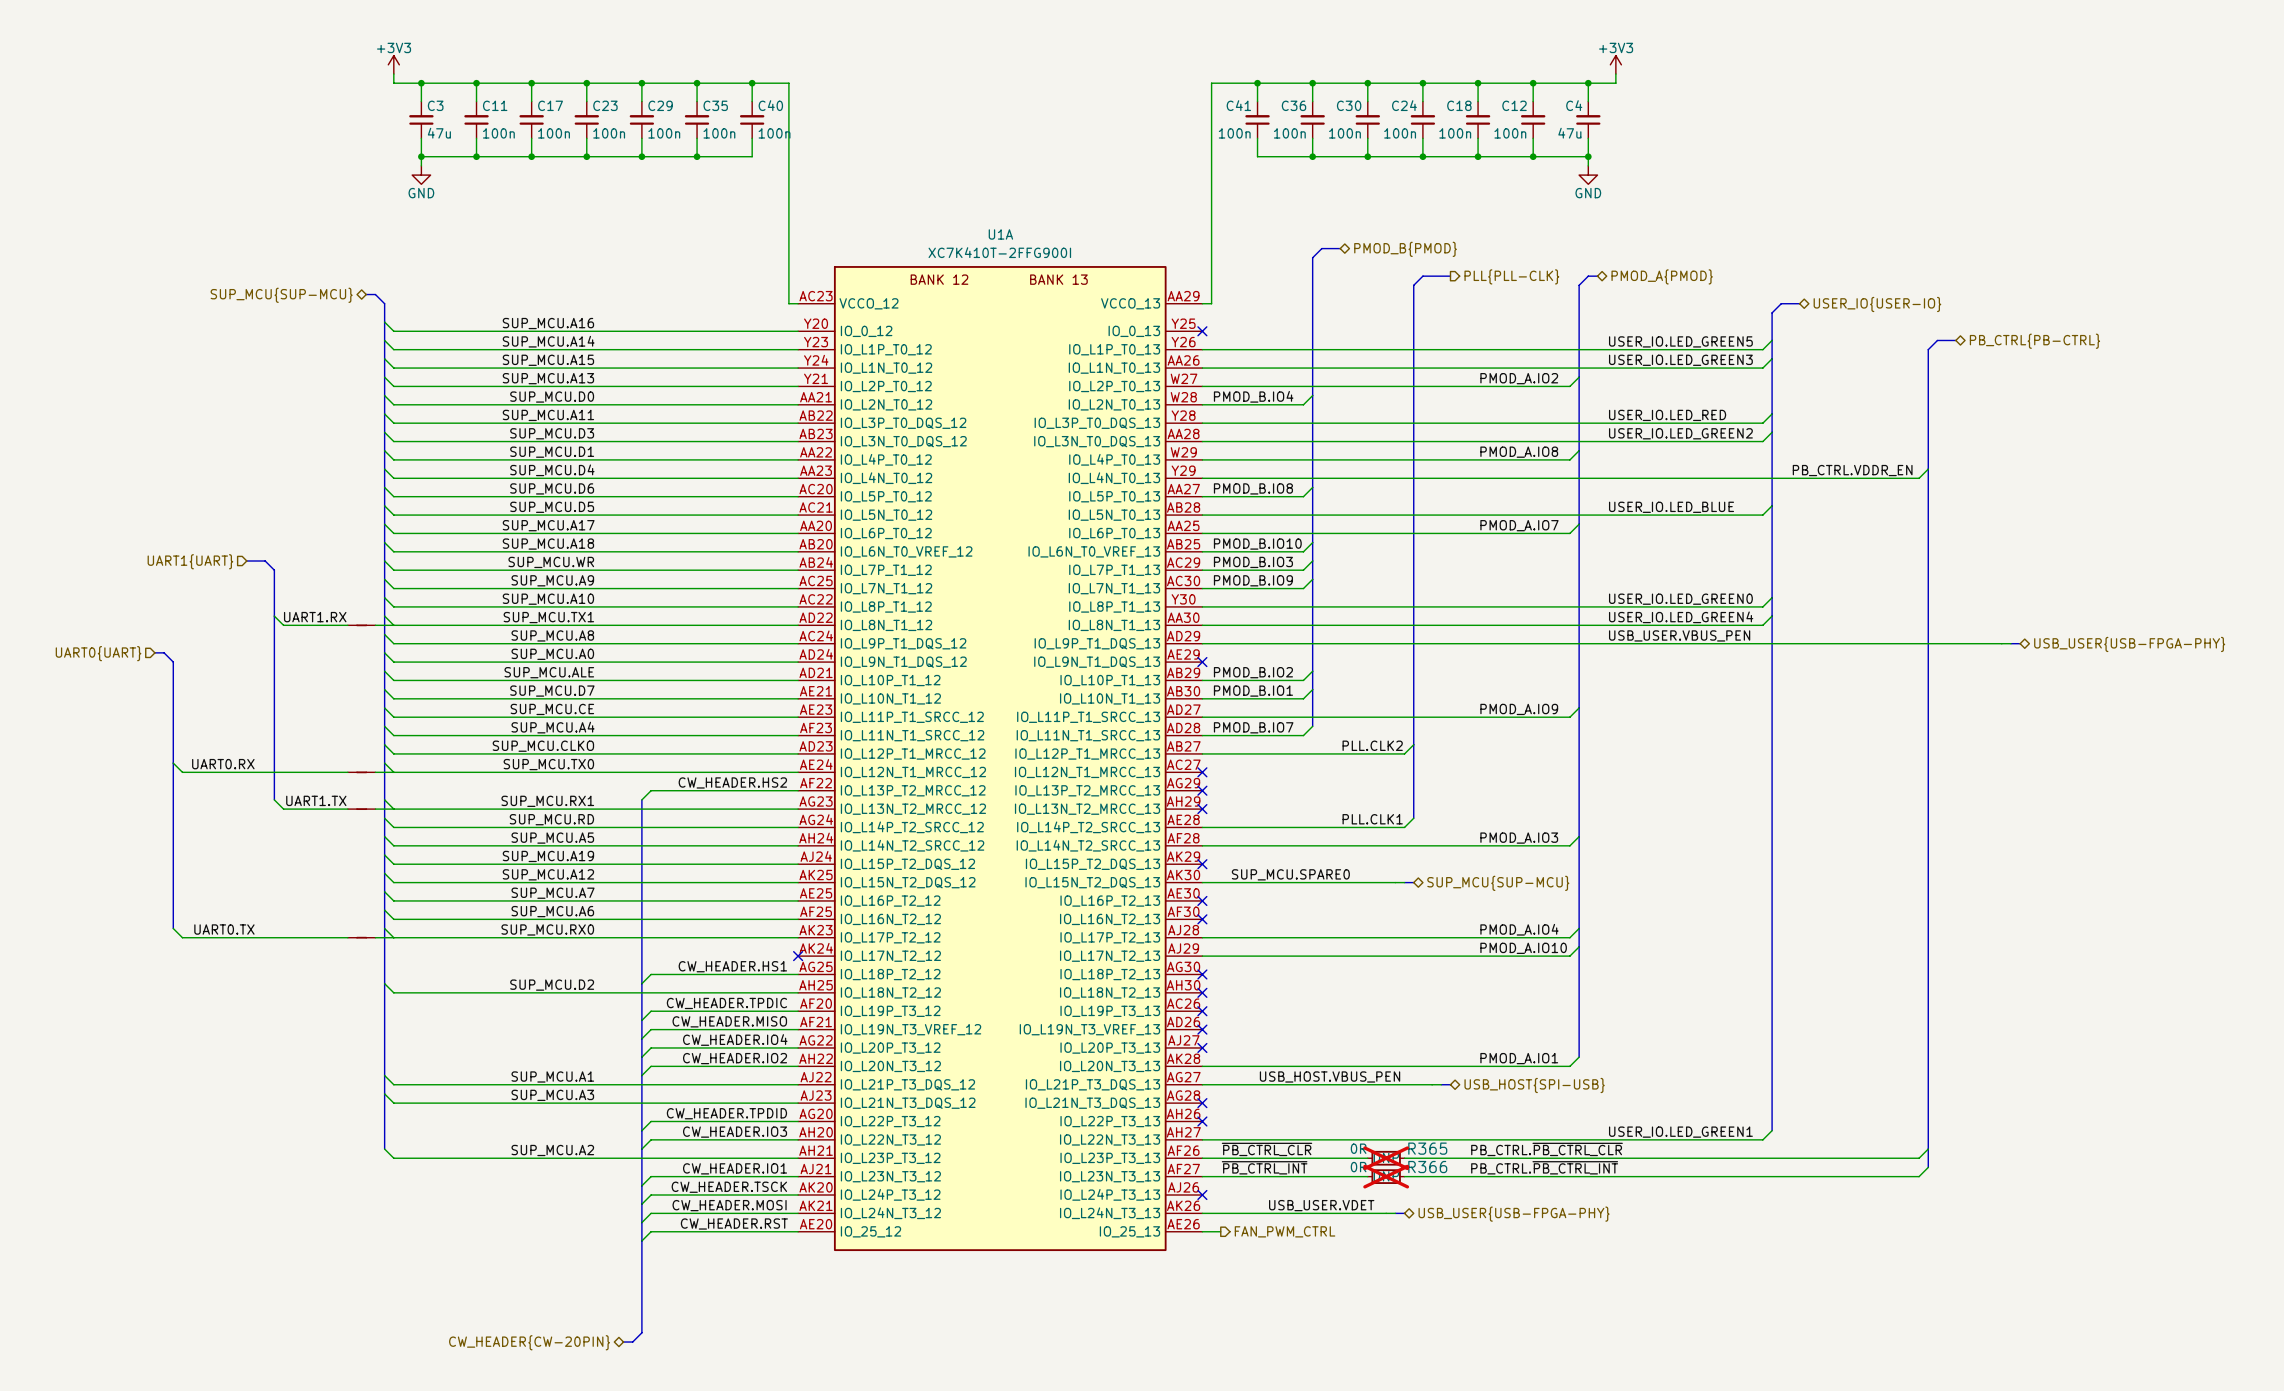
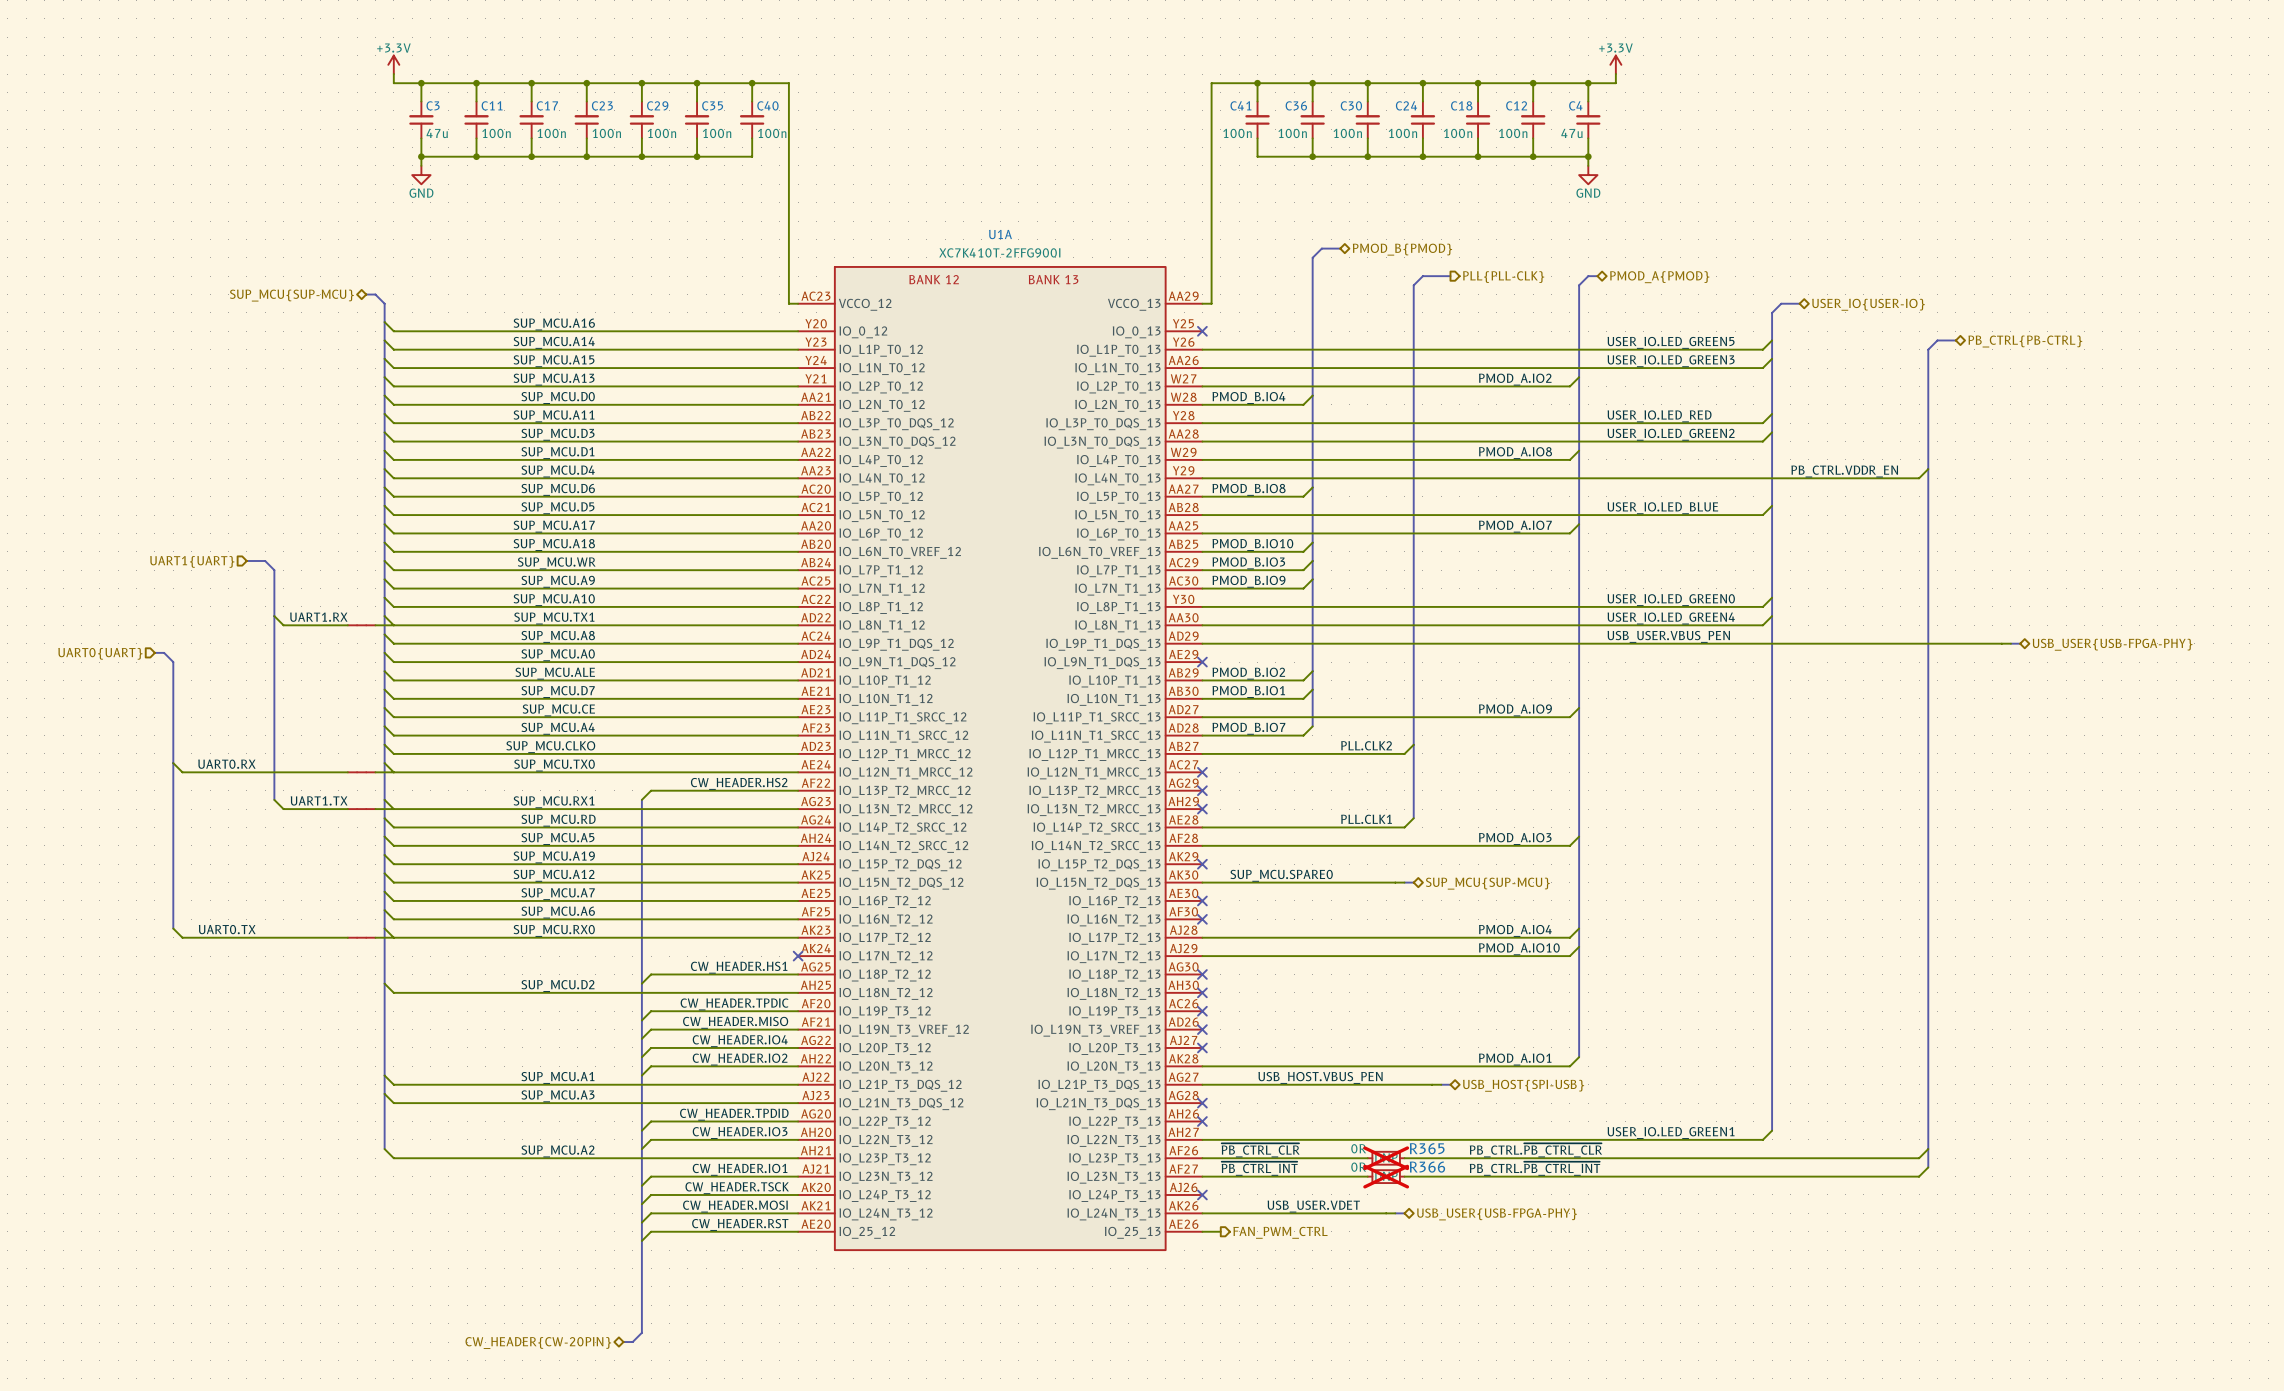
power symbol: +3V3 (393, 64) -> +3.3V (393, 64)
power symbol: +3V3 (1615, 64) -> +3.3V (1615, 64)

